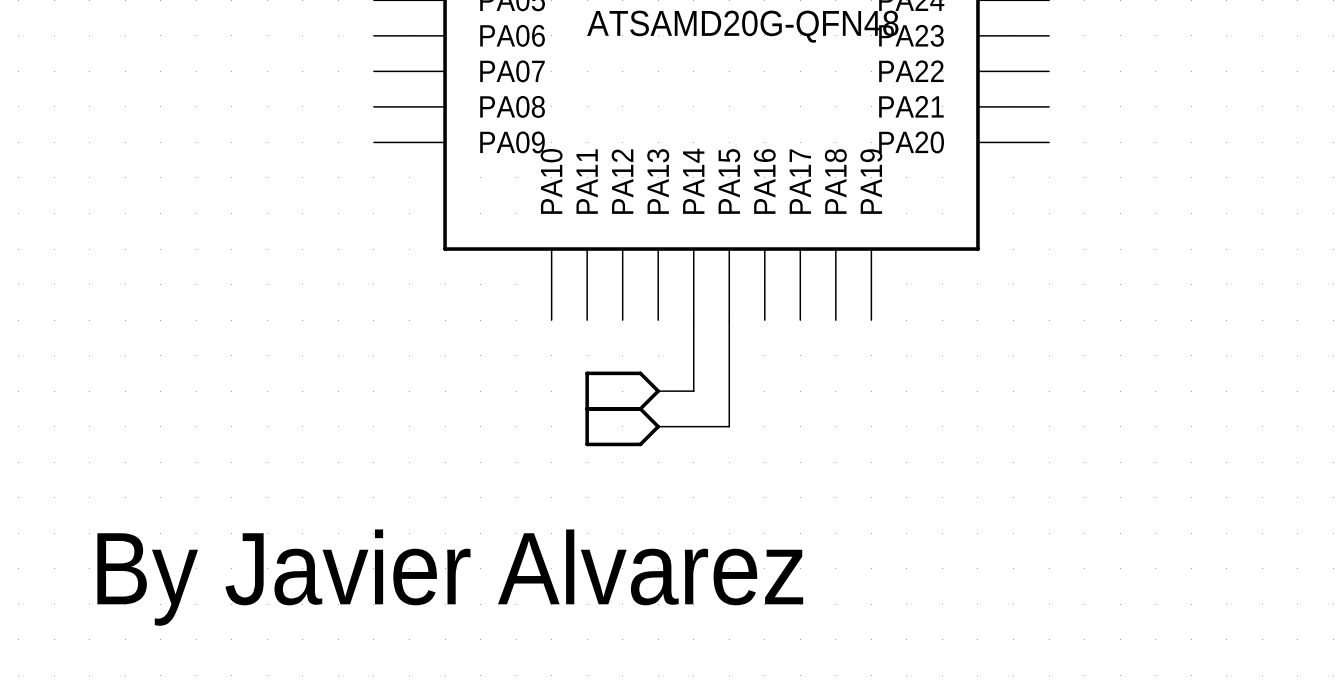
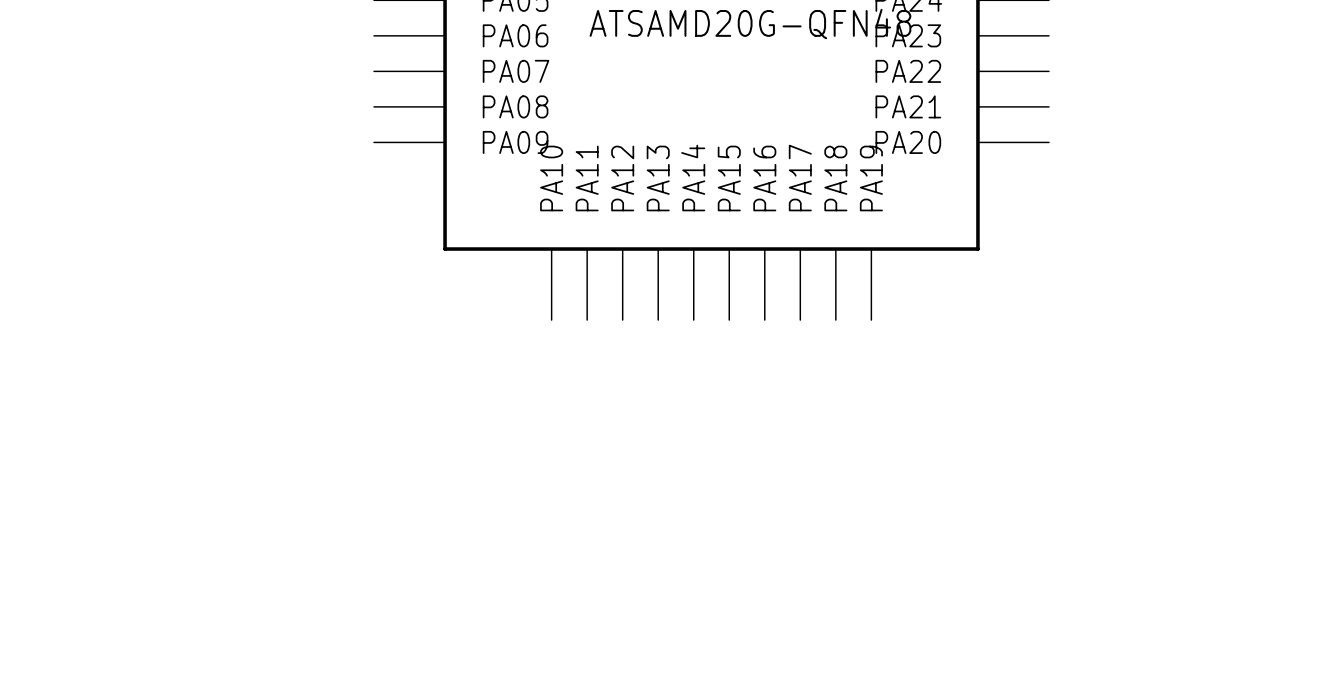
wire: (693, 320) (693, 391) (658, 391) -> none
wire: (729, 320) (729, 426) (658, 426) -> none
part: (622, 391) -> none
part: (622, 426) -> none
text: By Javier Alvarez (450, 577) -> none

